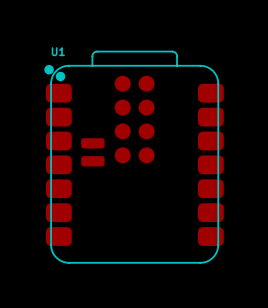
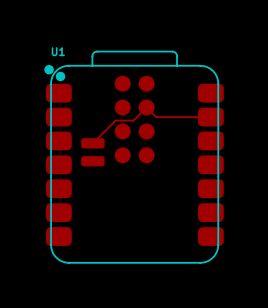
track: none -> (210, 117) (156, 117) (146, 107) (133, 120) (115, 120) (92, 143)

